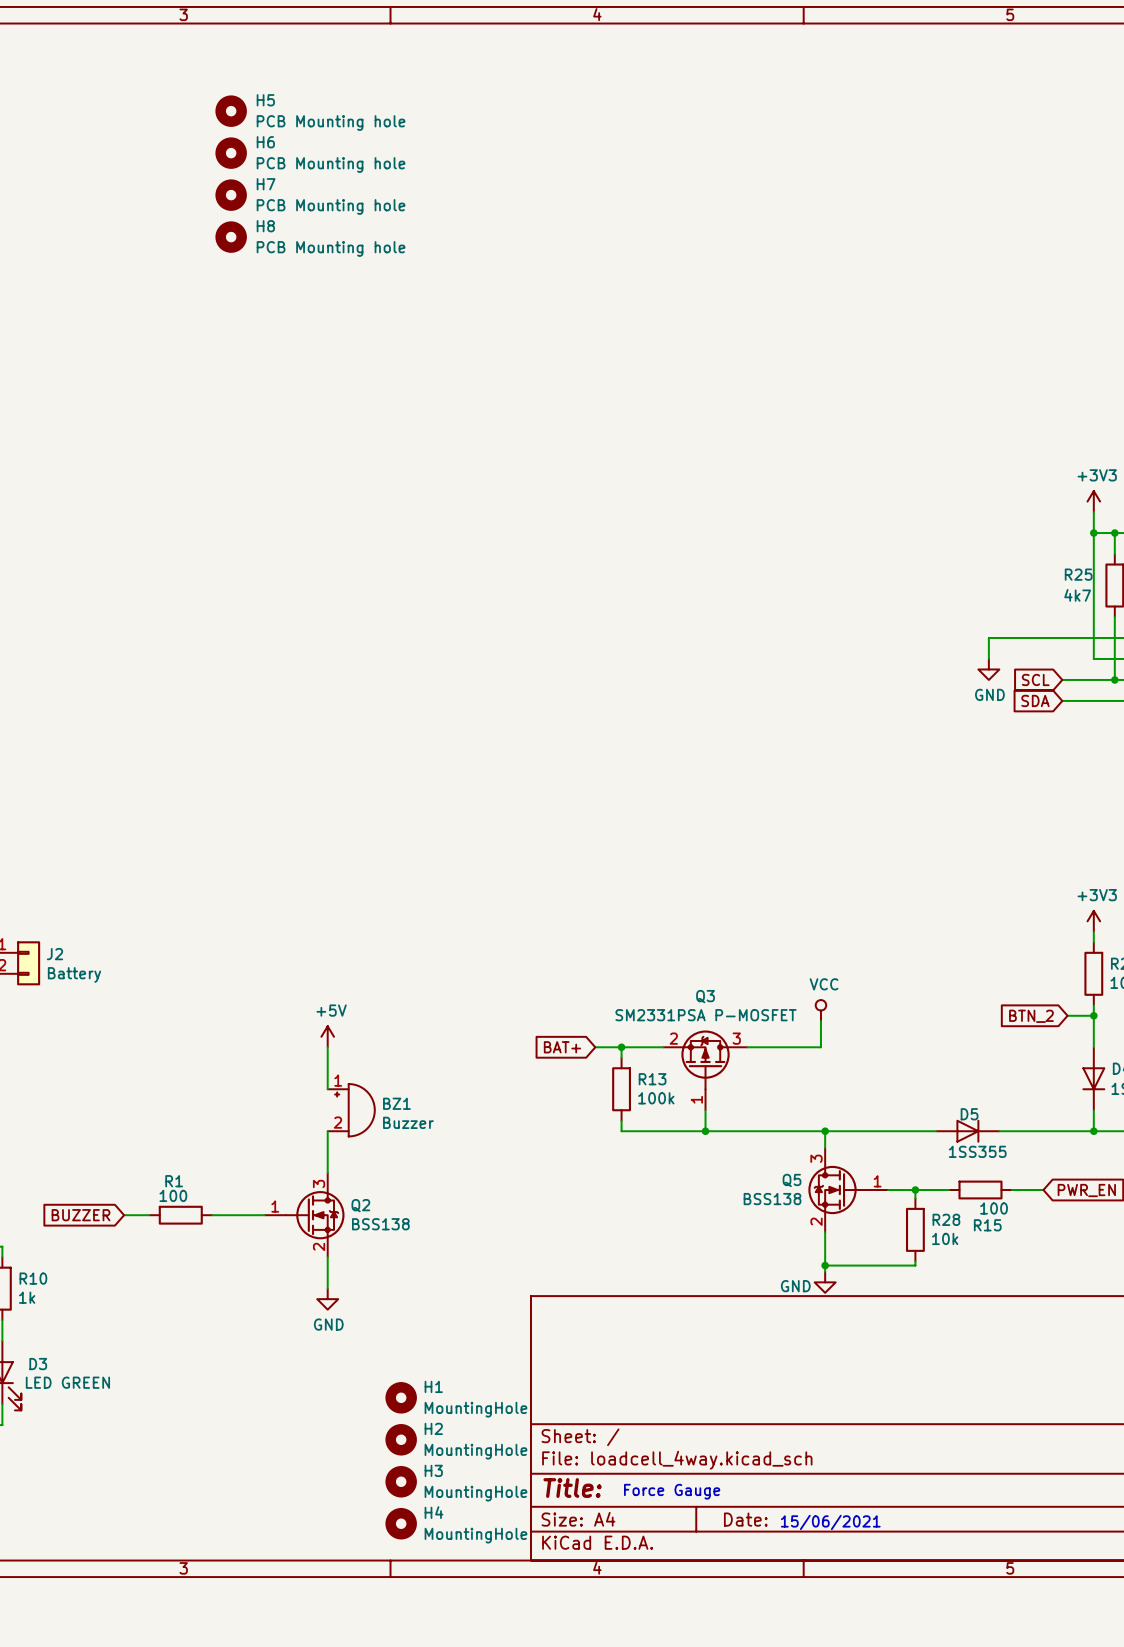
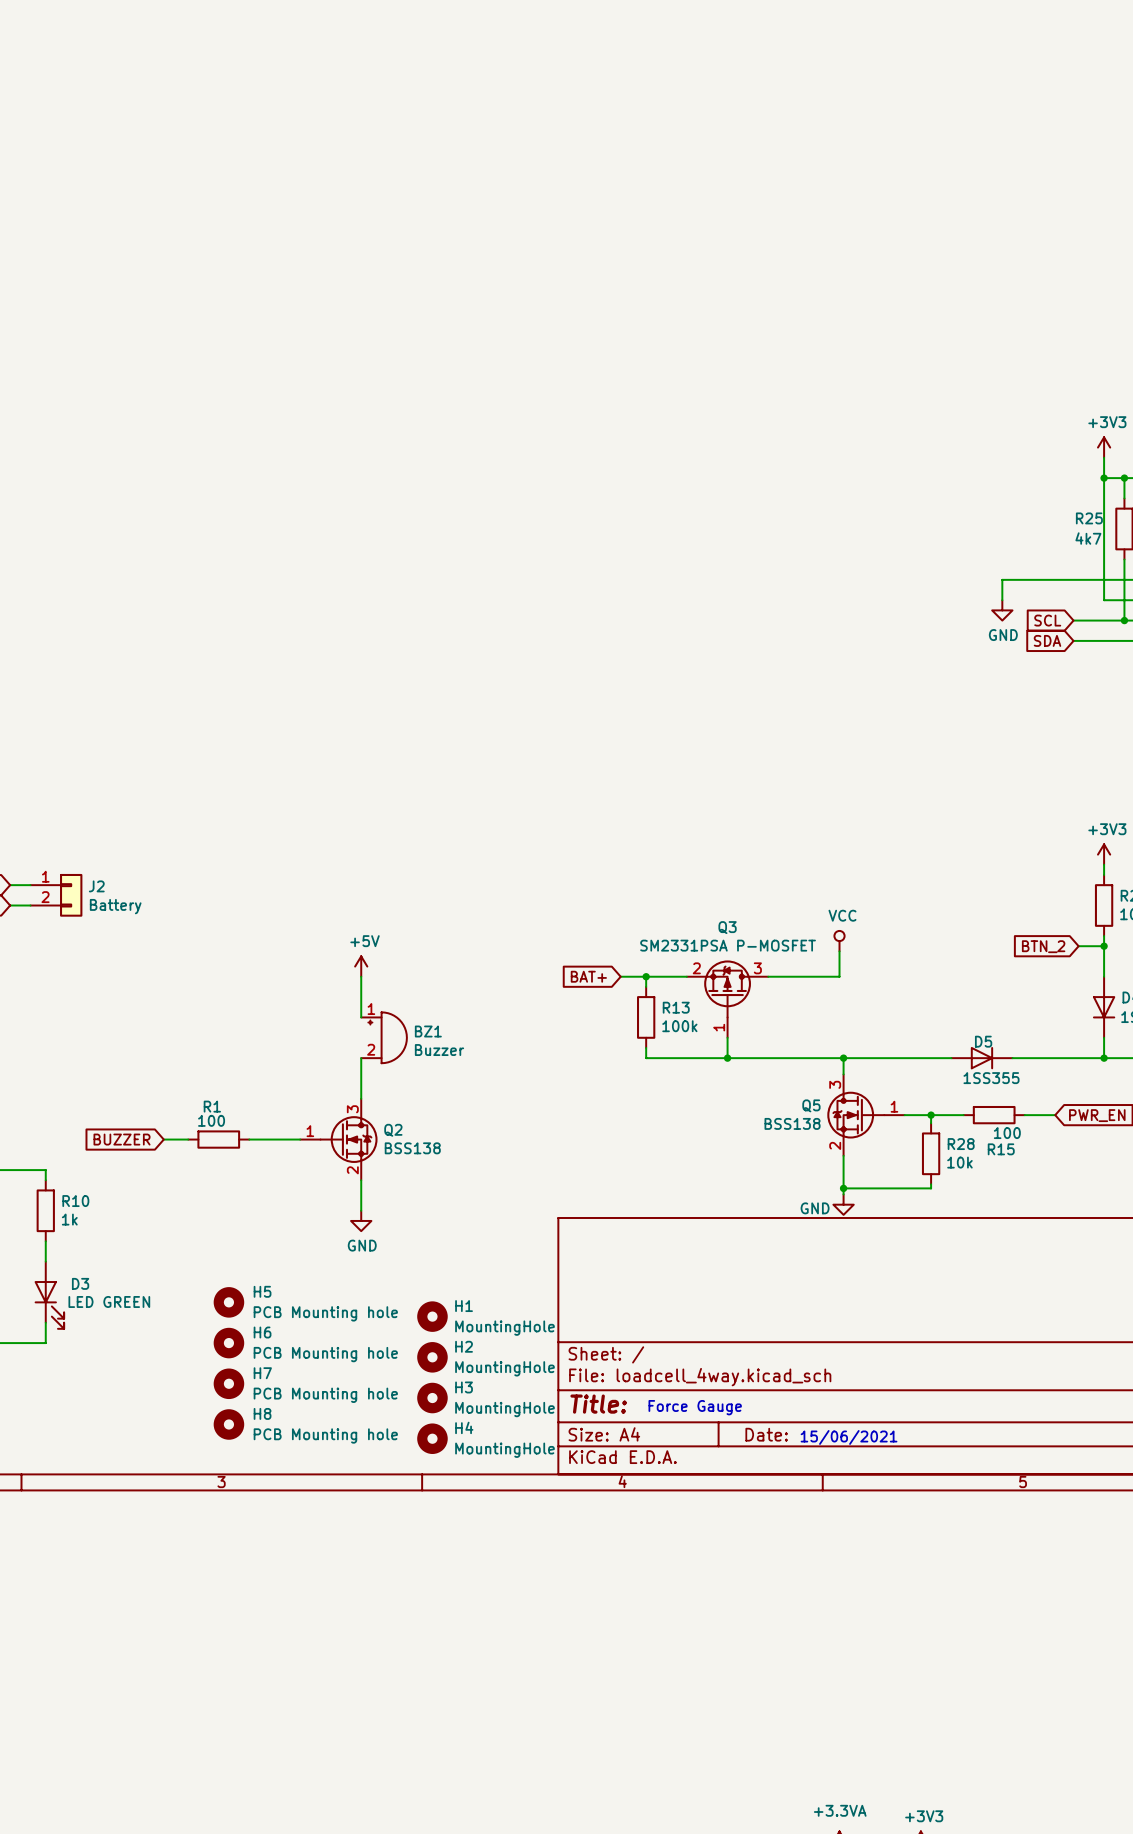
H5 position: (231, 111) -> (228, 1302)
H6 position: (231, 153) -> (228, 1343)
H7 position: (231, 195) -> (228, 1383)
H8 position: (231, 237) -> (228, 1424)

